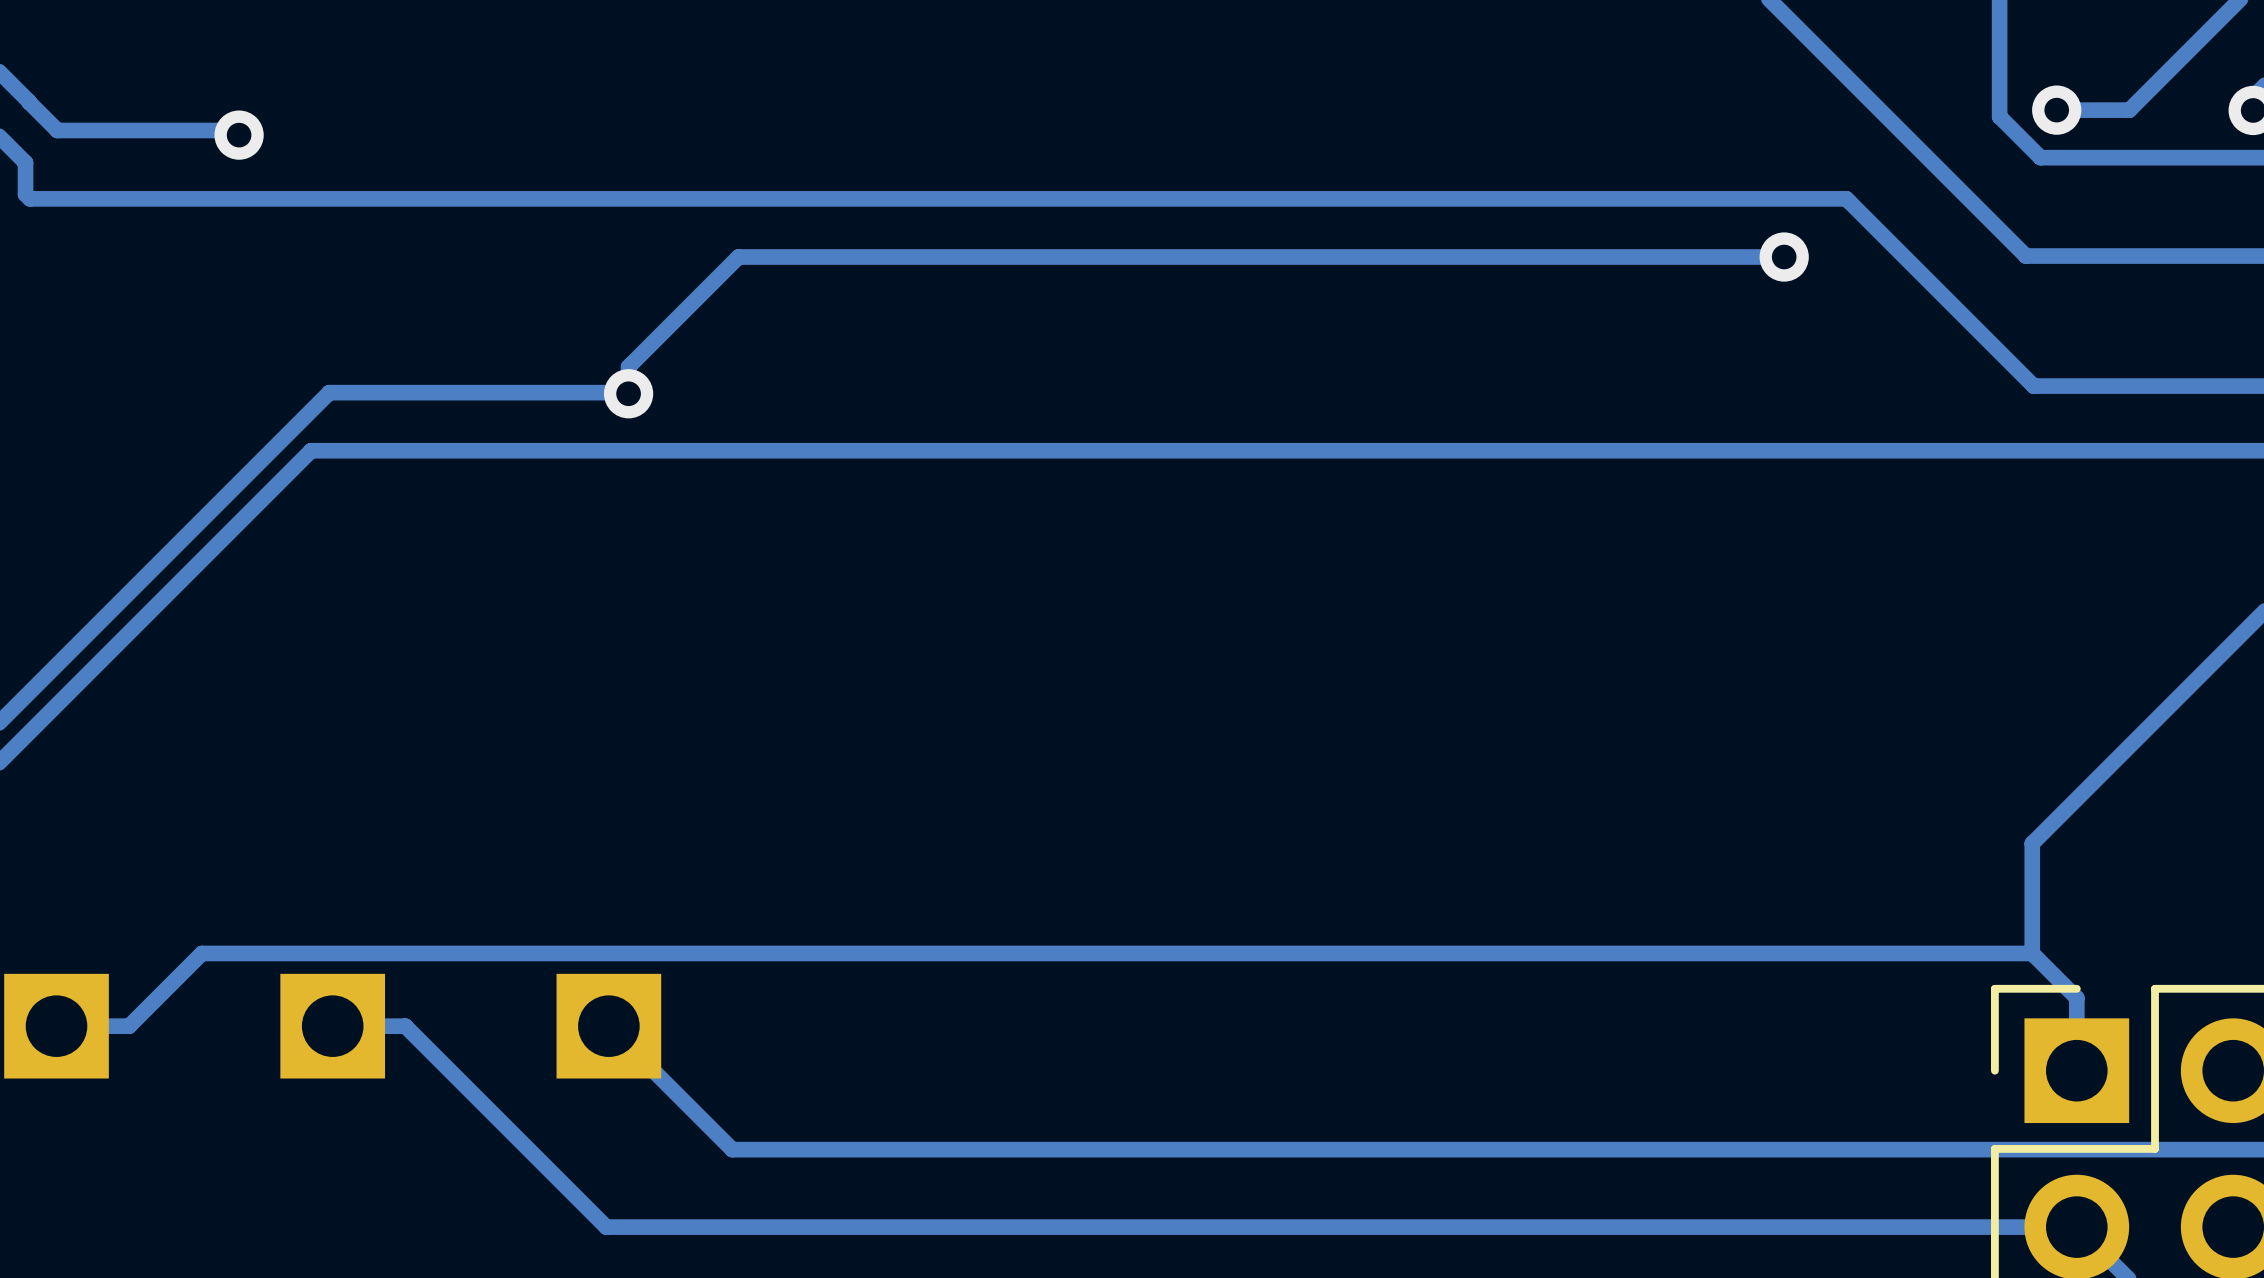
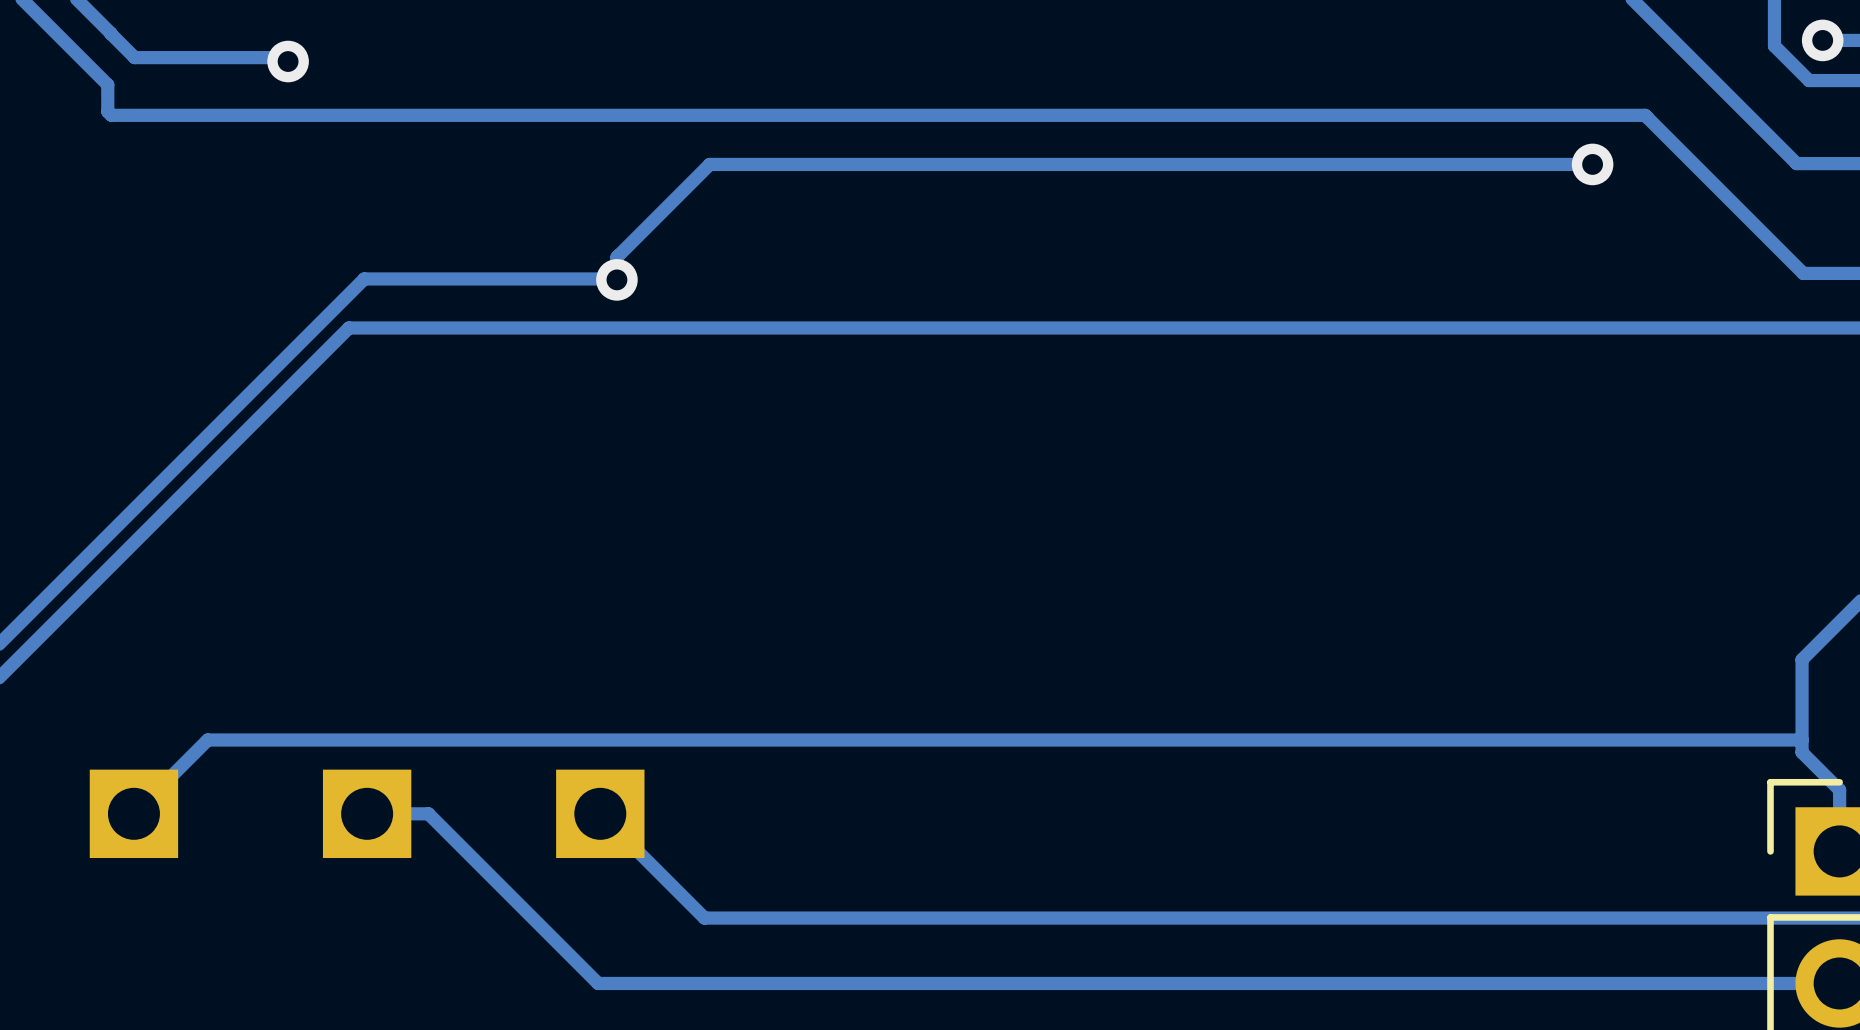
track: (2032, 953) (201, 953) (129, 1026) (56, 1026) -> (1802, 740) (207, 740) (133, 813)

